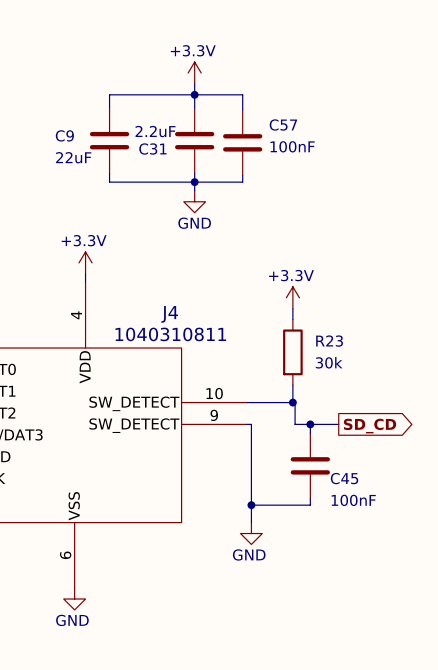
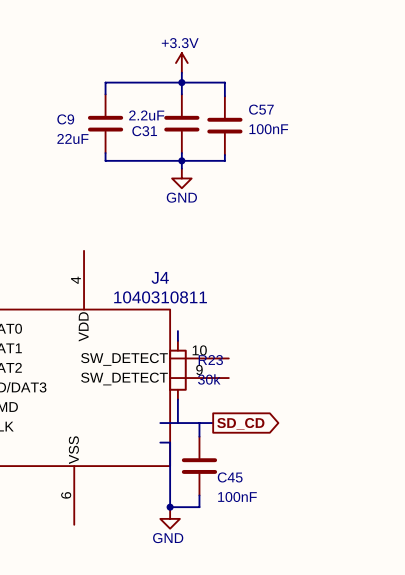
power symbol: +3.3V (85, 262) -> none
wire: (85, 273) (85, 282) -> none
power symbol: +3.3V (292, 297) -> none
wire: (292, 308) (292, 319) -> (177, 331) (177, 340)
R23 position: (292, 352) -> (177, 370)
wire: (292, 385) (292, 402) -> none
wire: (247, 402) (295, 402) (295, 424) (338, 424) -> none
junction: (292, 402) -> none
wire: (247, 424) (251, 424) (251, 522) -> none
wire: (310, 424) (310, 433) -> none
junction: (310, 424) -> none
global label position: SD_CD (370, 426) -> SD_CD (240, 423)
wire: none -> (177, 399) (177, 423)
C45 position: (310, 465) -> (199, 466)
wire: none -> (160, 423) (213, 423)
wire: none -> (199, 423) (199, 436)
wire: none -> (160, 442) (170, 442) (170, 509)
wire: (310, 498) (310, 505) (251, 505) -> none
junction: (251, 505) -> none
power symbol: GND (251, 533) -> none
wire: none -> (199, 495) (199, 507) (170, 507)
junction: none -> (170, 507)
power symbol: none -> GND (170, 518)
power symbol: GND (74, 599) -> none

